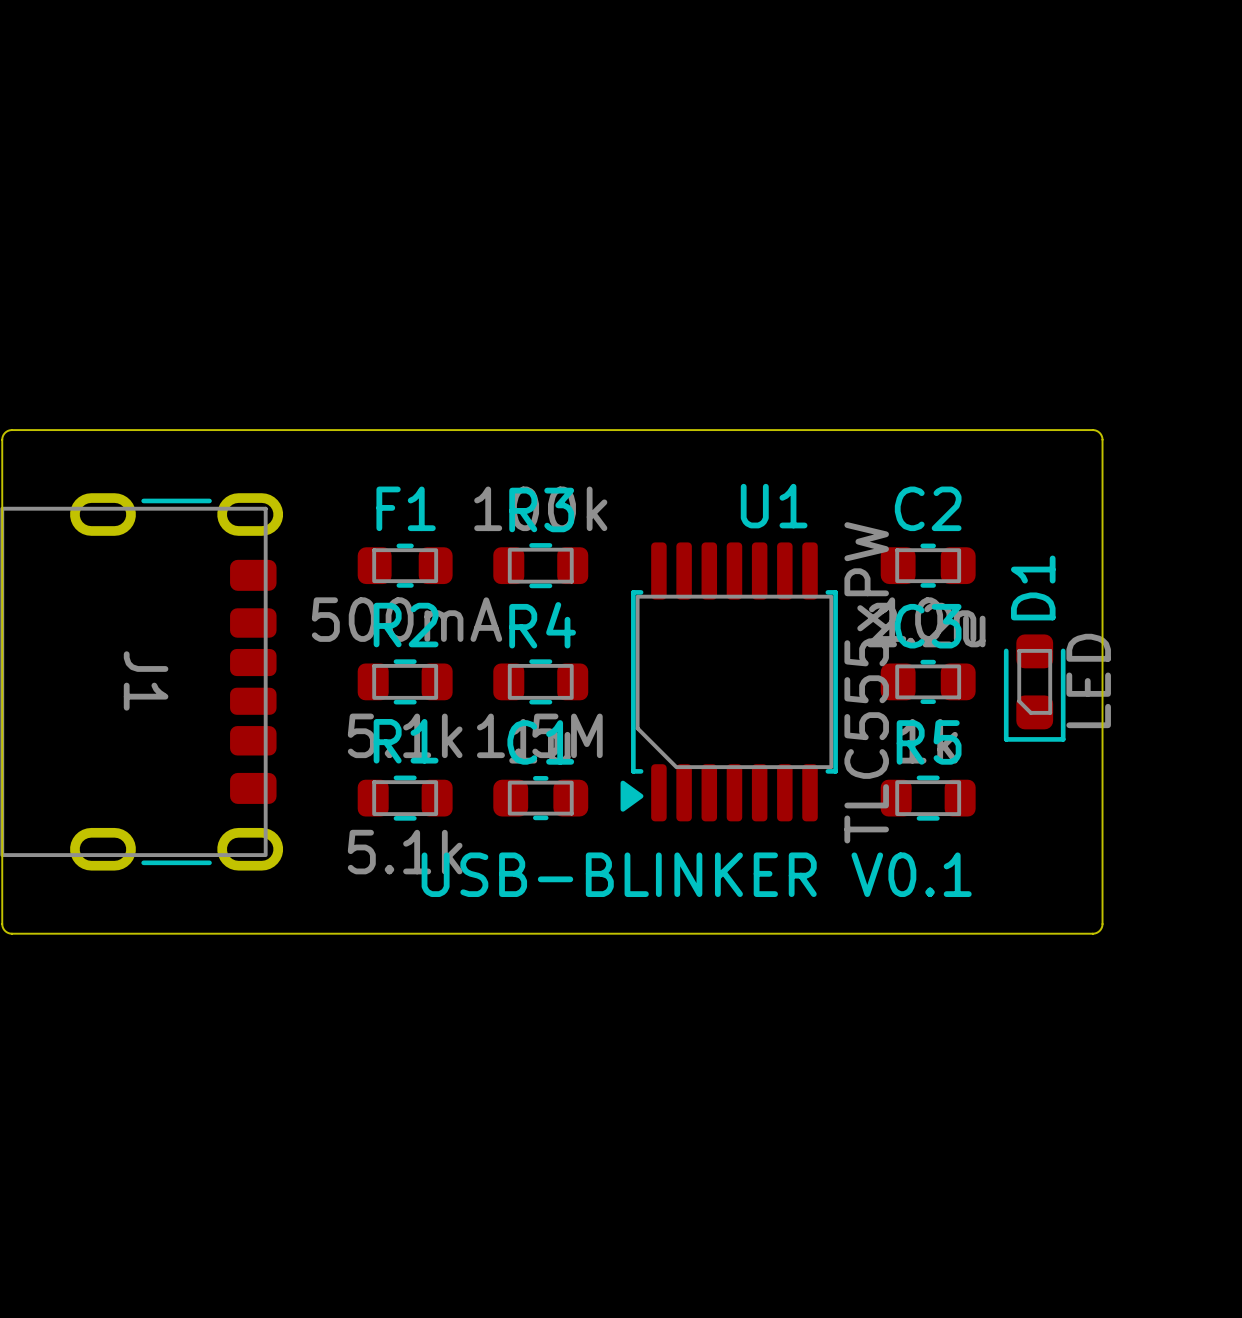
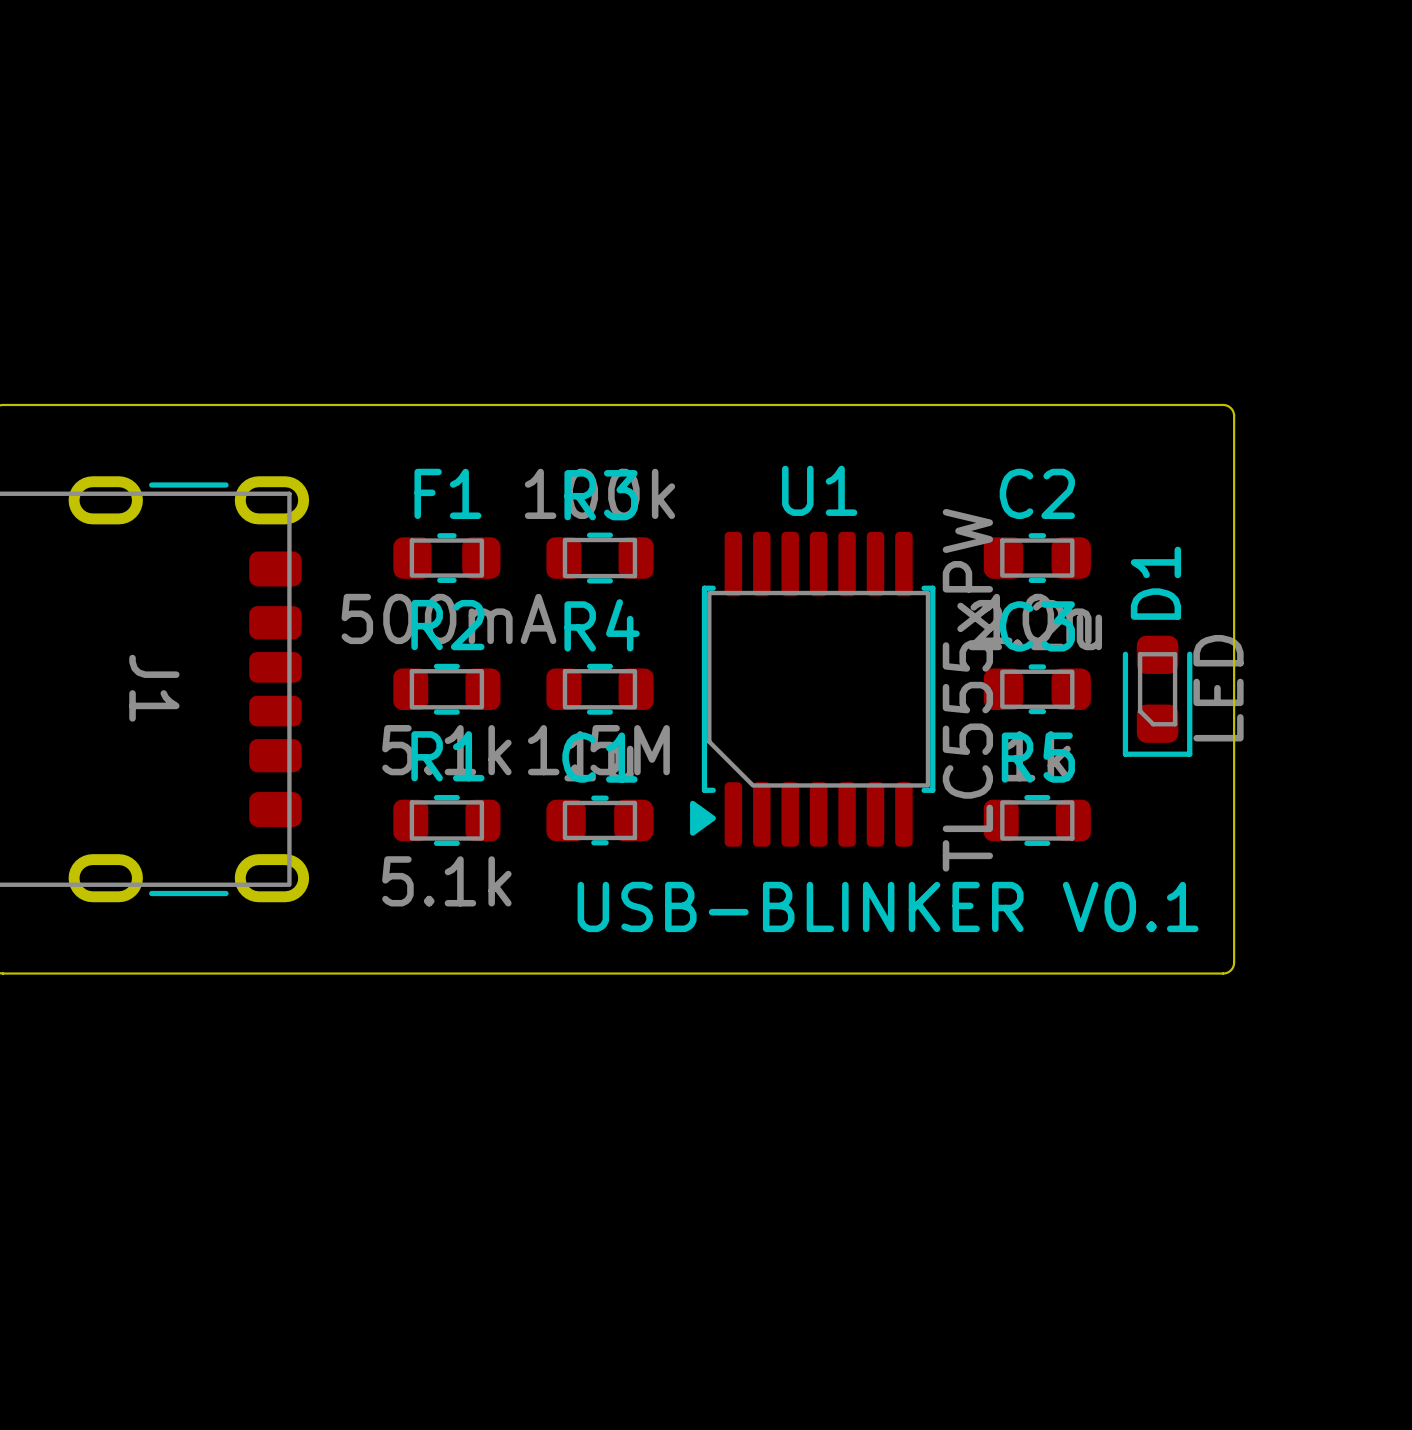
U1 name position: U1 (774, 506) -> U1 (819, 490)
text position: USB-BLINKER V0.1 (696, 874) -> USB-BLINKER V0.1 (888, 906)

